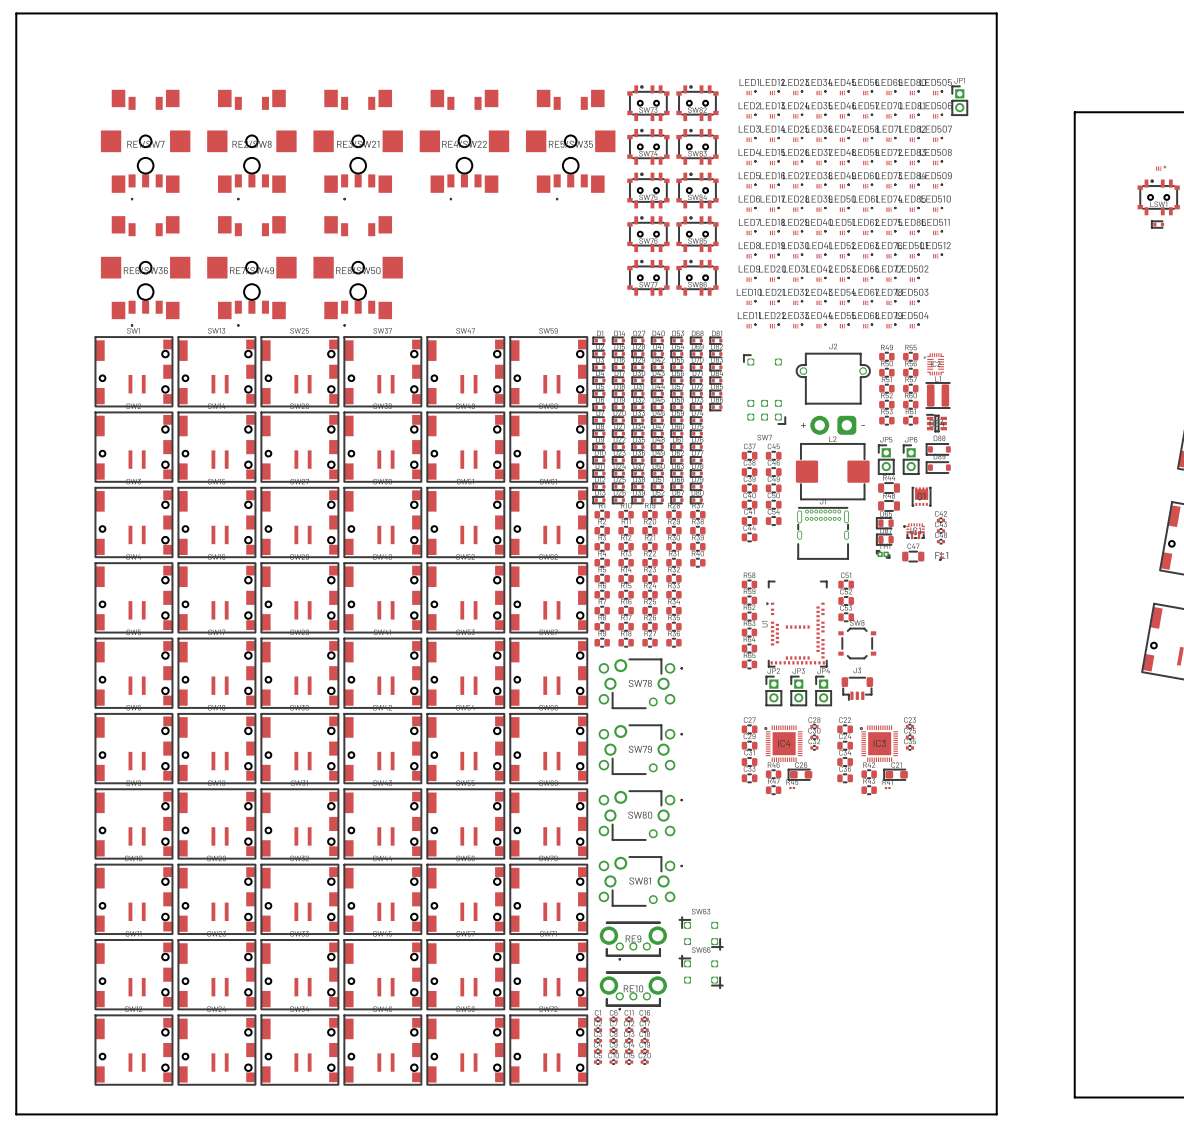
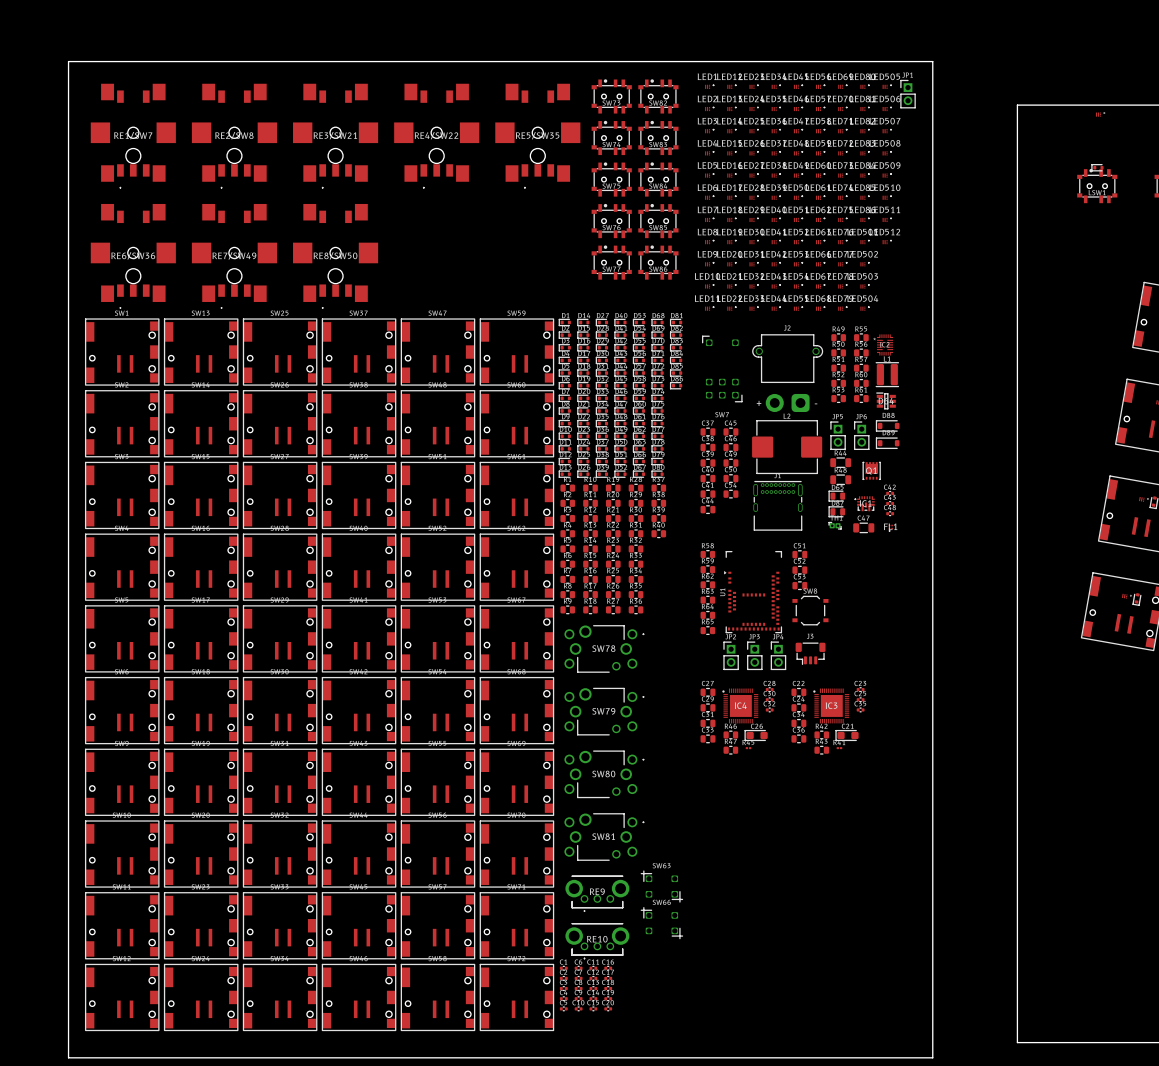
board edge: (16, 13) (996, 13) (996, 1114) (16, 1114) (16, 13) -> (68, 61) (68, 1057) (932, 1057) (932, 61) (68, 61)
part position: (1160, 168) -> (1100, 114)
part position: (1157, 224) -> (1097, 167)

